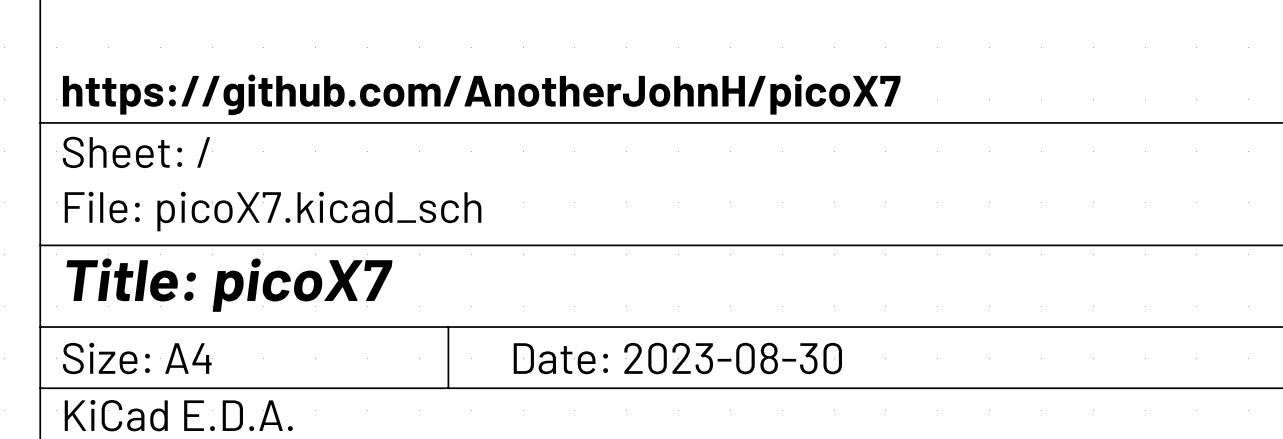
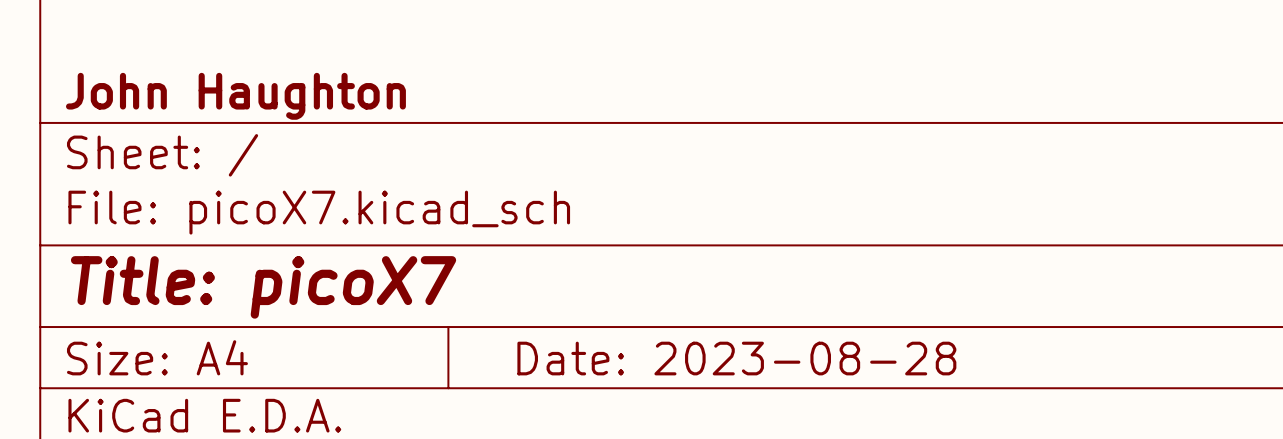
title block: https://github.com/AnotherJohnH/picoX7 (481, 94) -> John Haughton (235, 96)
title block: Date: 2023-08-30 (677, 358) -> Date: 2023-08-28 (736, 358)

